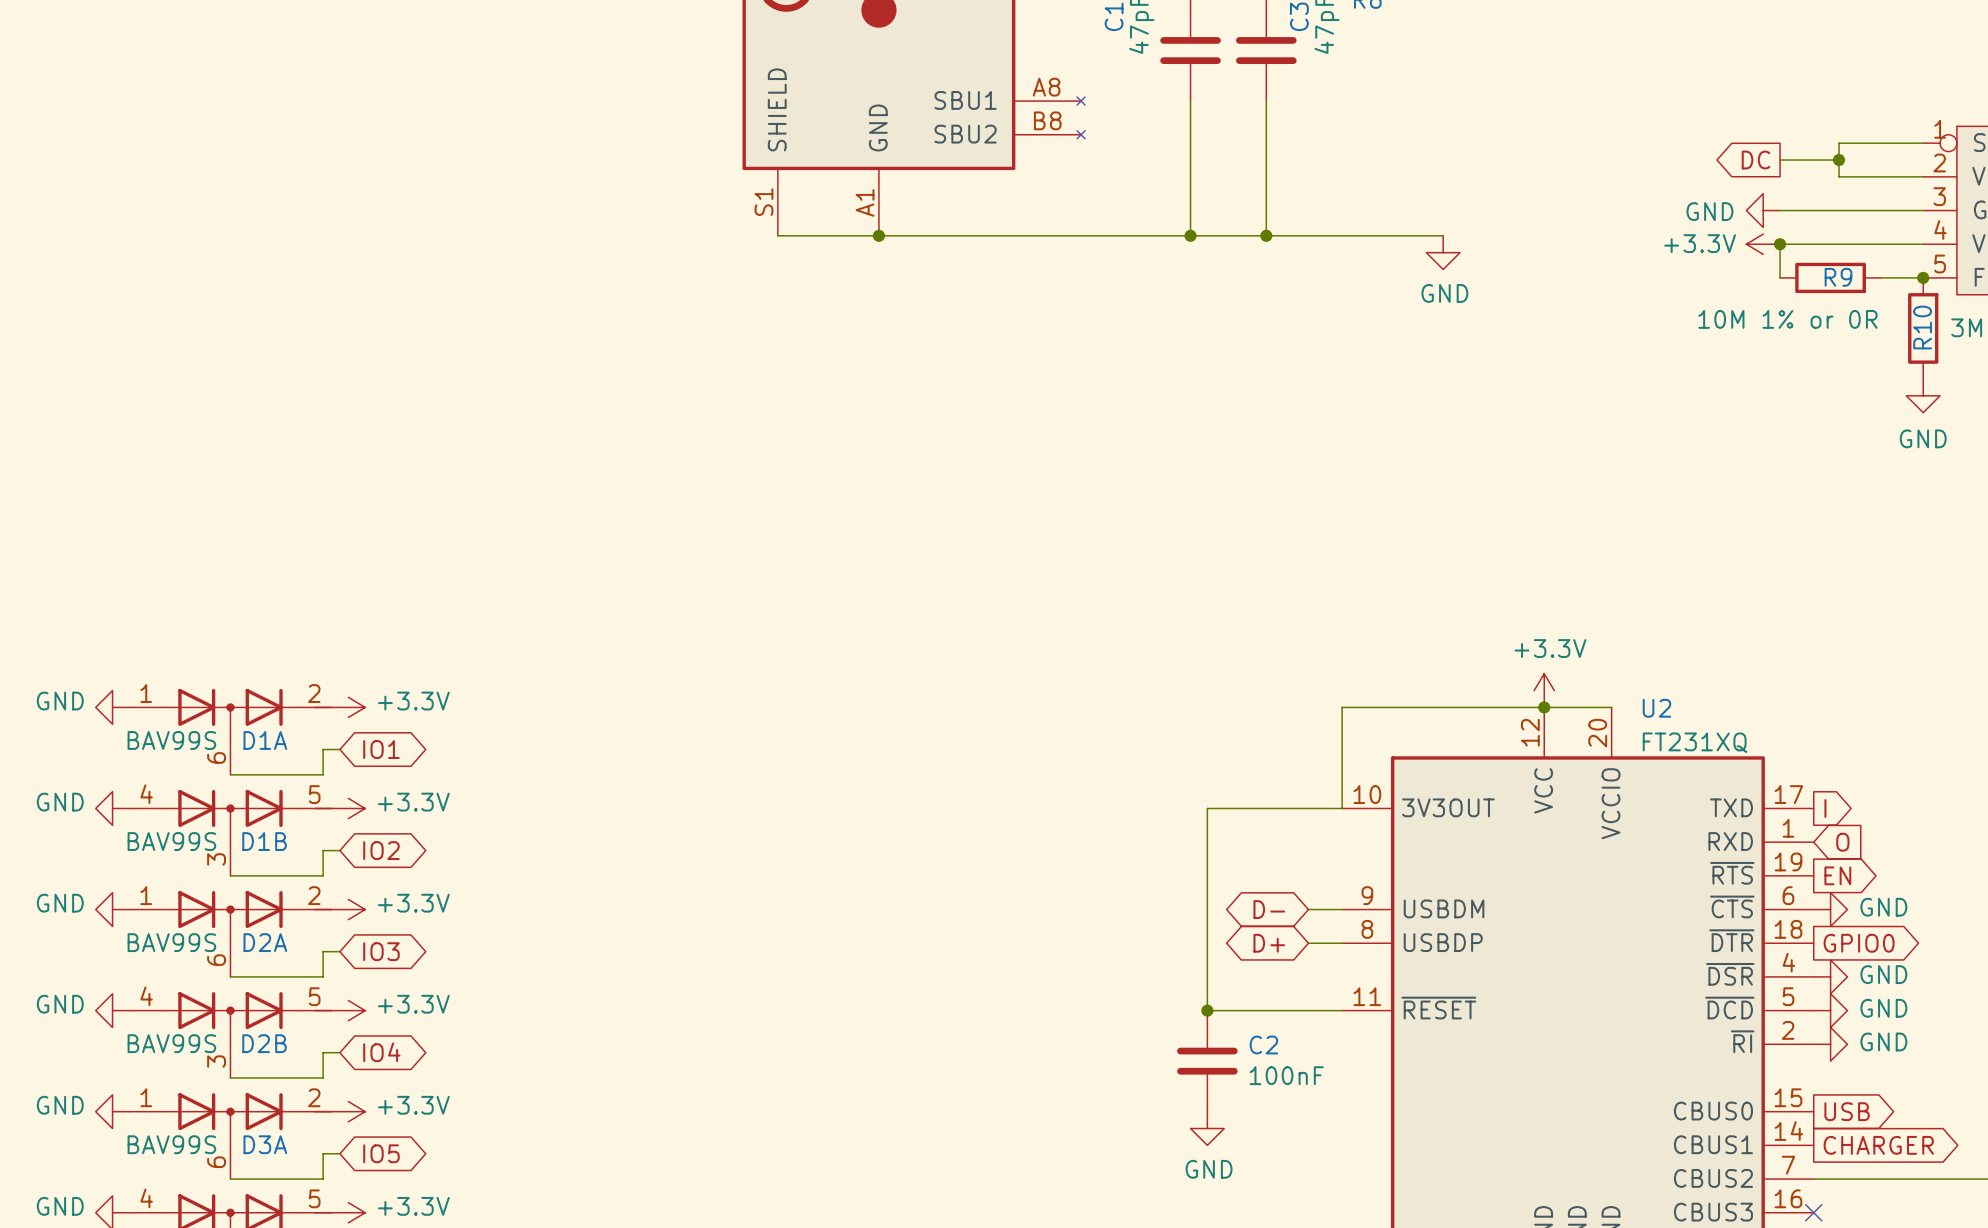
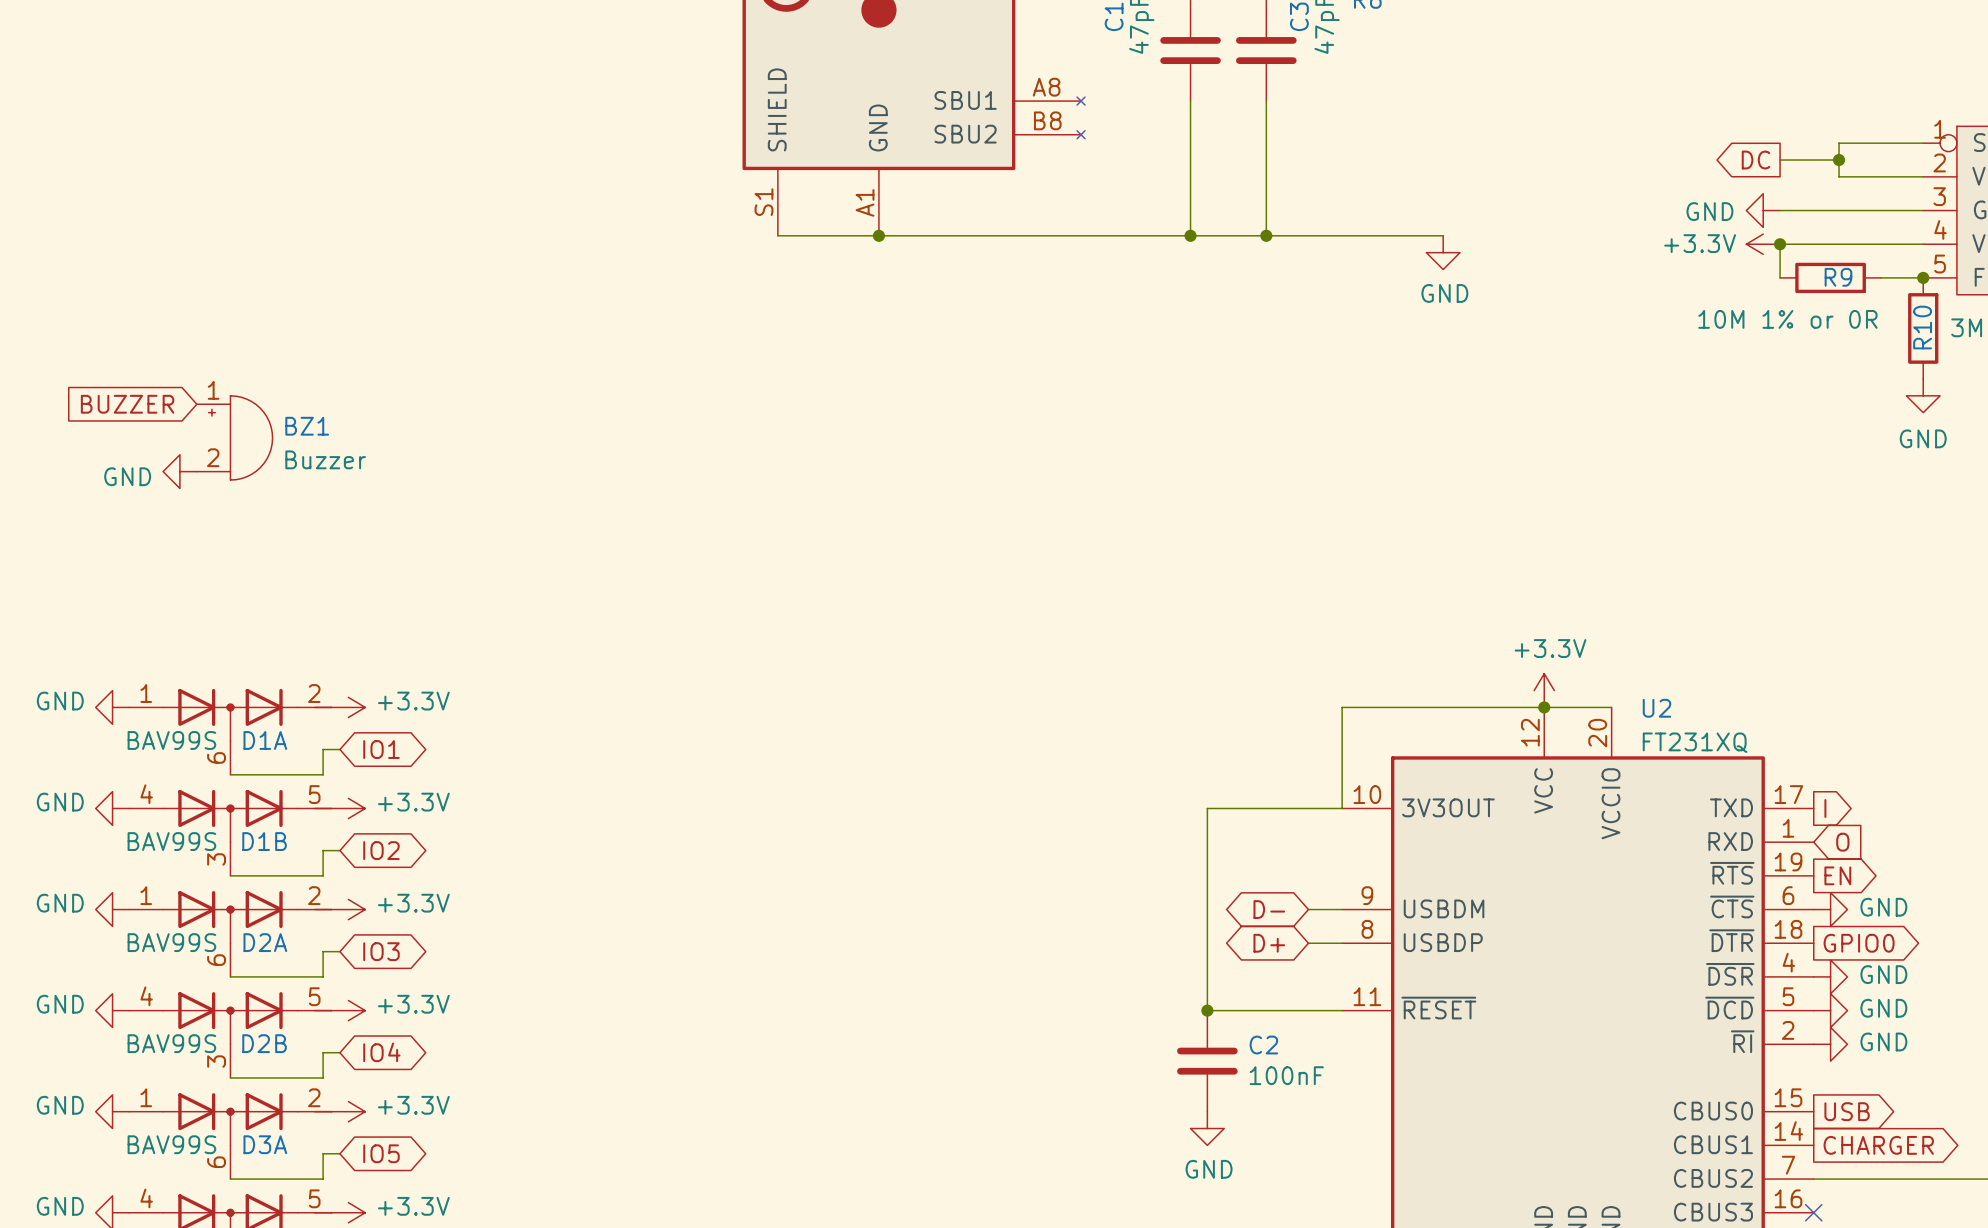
global label: none -> BUZZER (127, 404)
BZ1: none -> Buzzer (234, 437)
power symbol: none -> GND (179, 471)

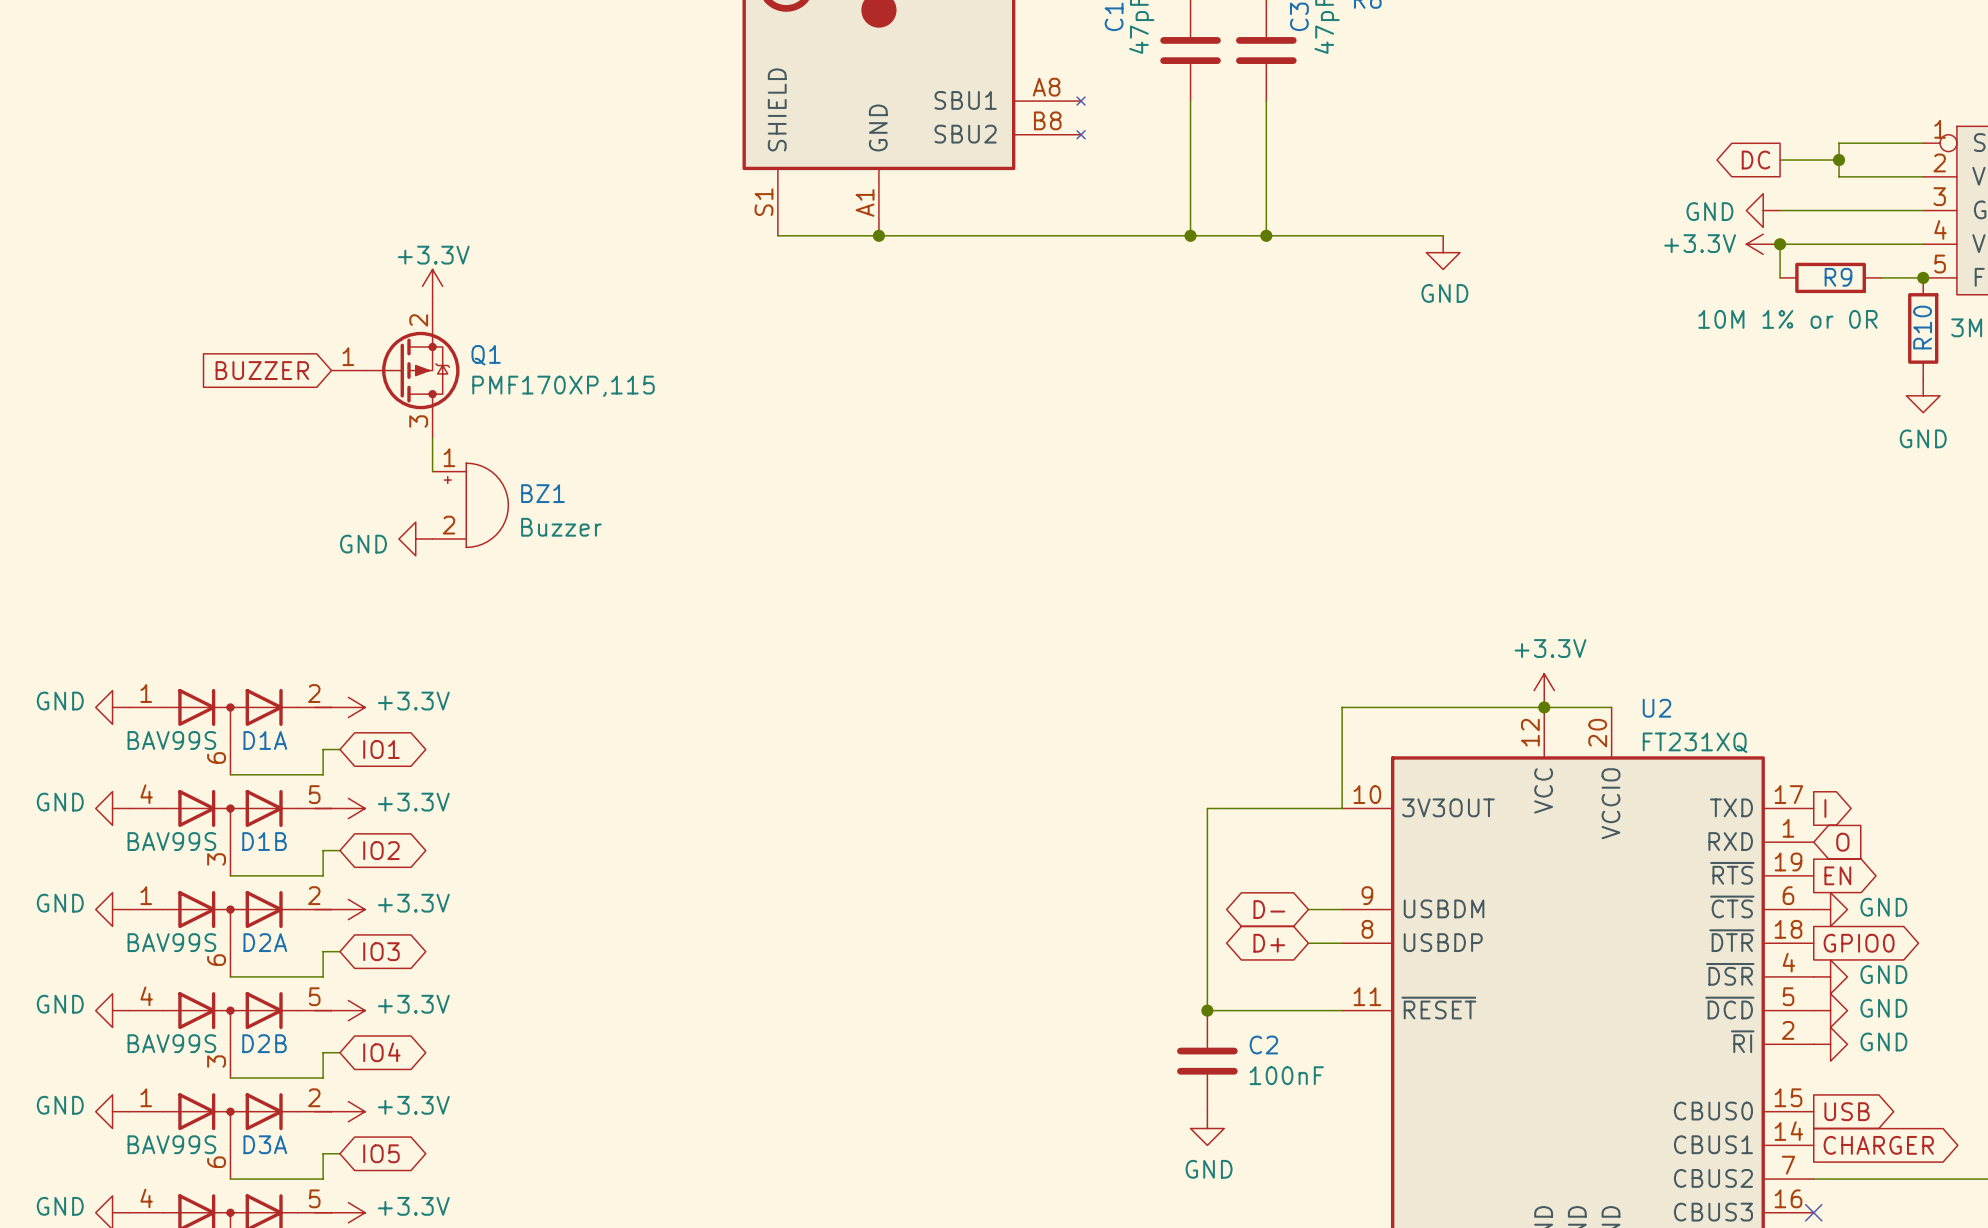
power symbol: none -> +3.3V (432, 286)
Q1: none -> PMF170XP,115 (395, 370)
global label position: BUZZER (127, 404) -> BUZZER (262, 370)
BZ1 position: (234, 437) -> (470, 505)
wire: none -> (432, 437) (432, 471)
power symbol position: GND (179, 471) -> GND (415, 538)

